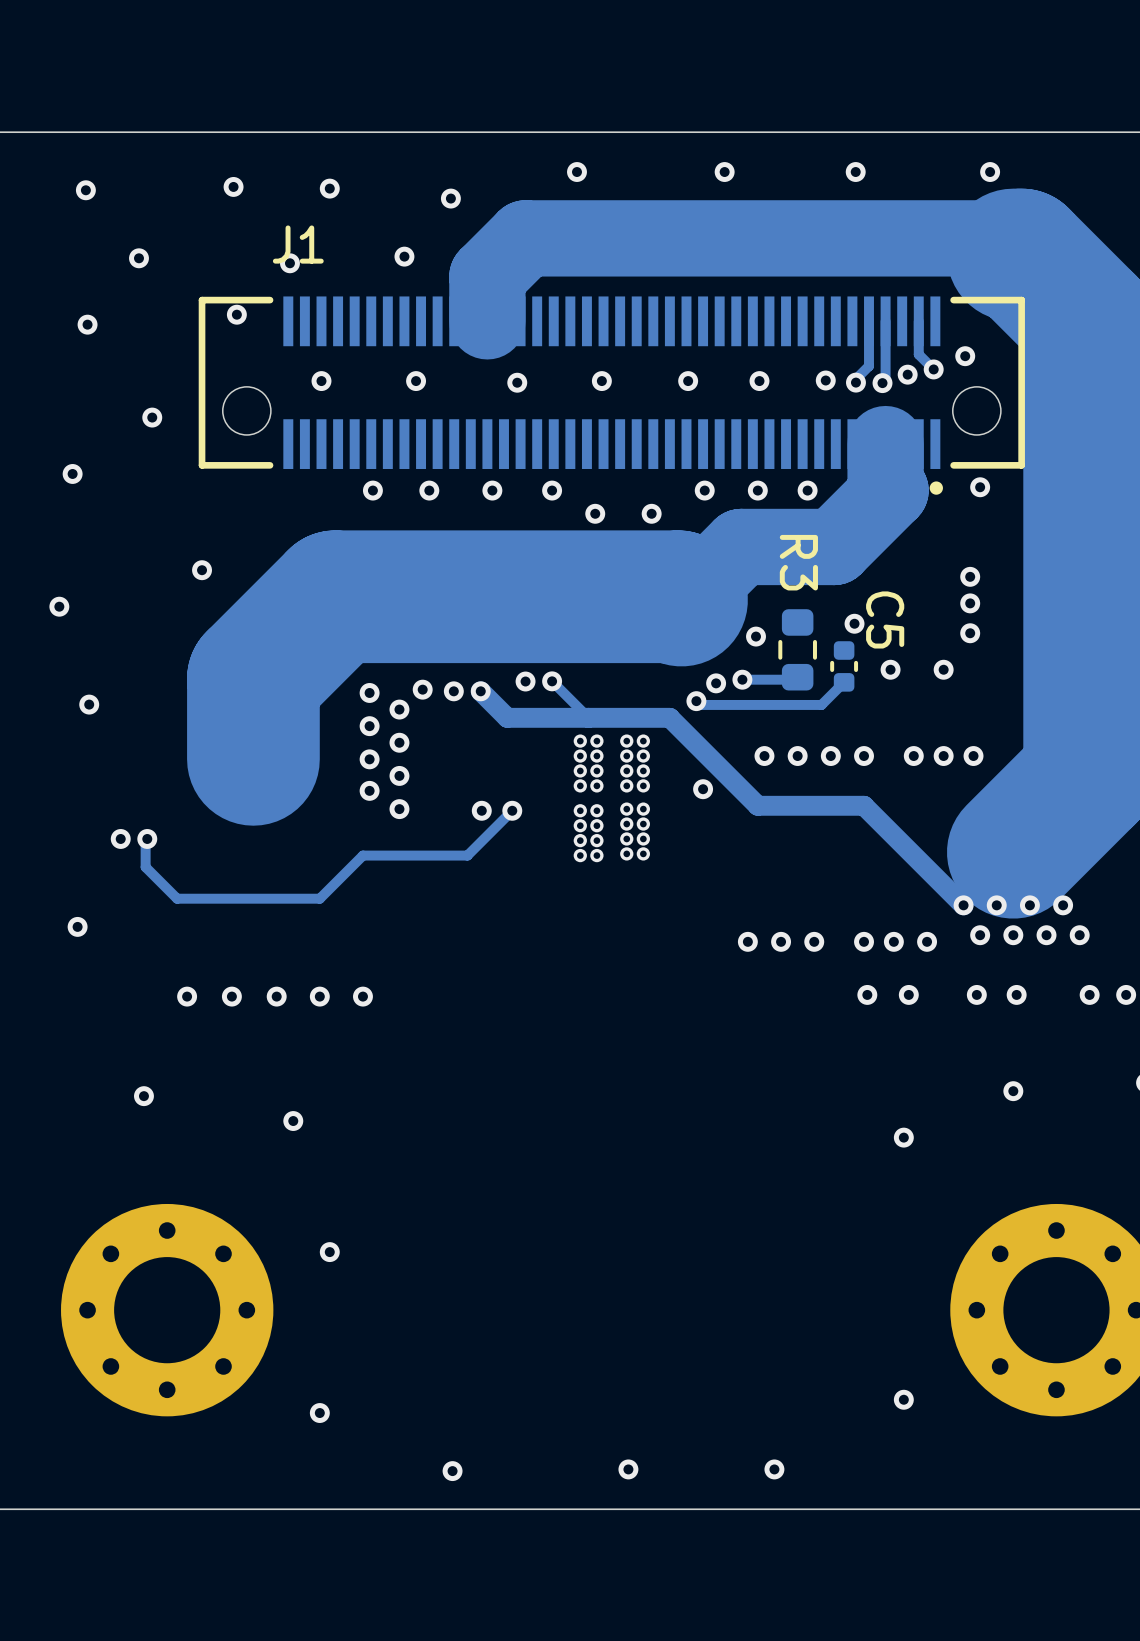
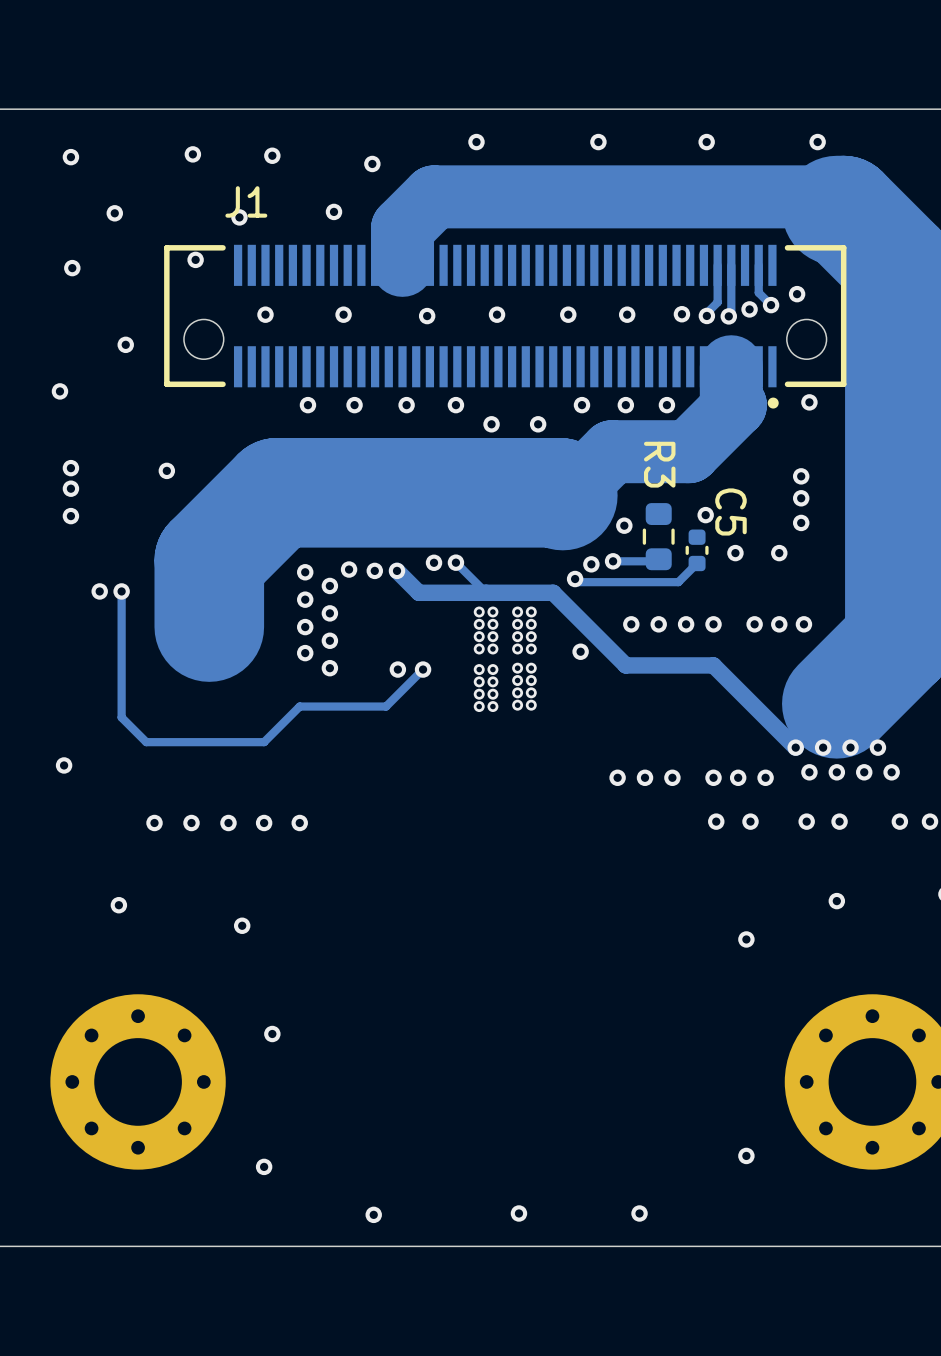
via: none -> (70, 468)
via: none -> (70, 488)
via: (59, 606) -> none
via: none -> (70, 516)
via: (89, 704) -> none
via: none -> (99, 591)
via: none -> (121, 591)
via: (120, 838) -> none
track: (147, 838) (145, 840) (145, 867) (147, 868) -> (121, 591) (121, 717)
via: (147, 838) -> none

